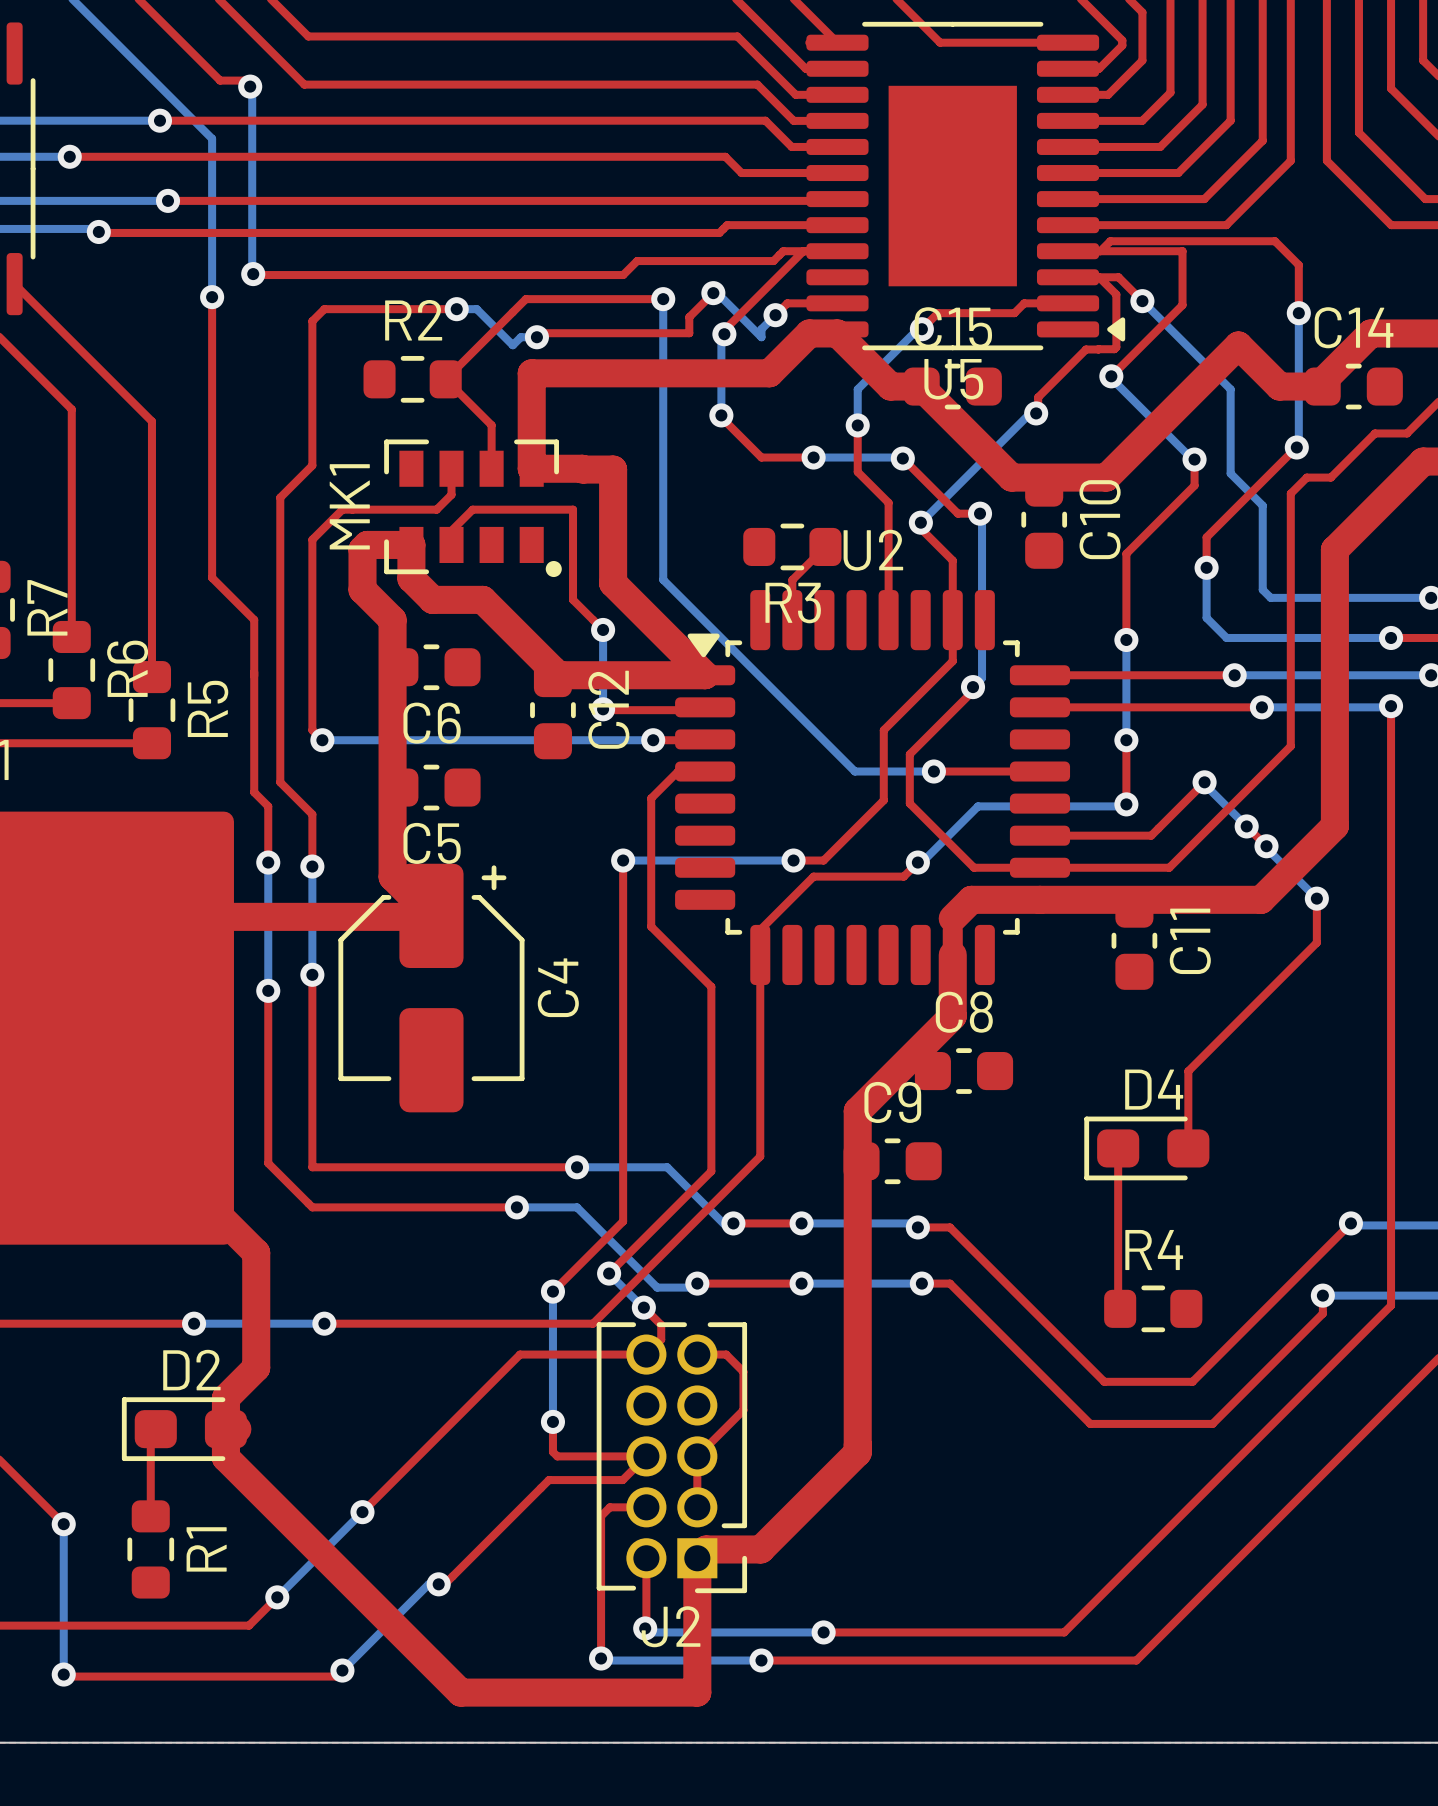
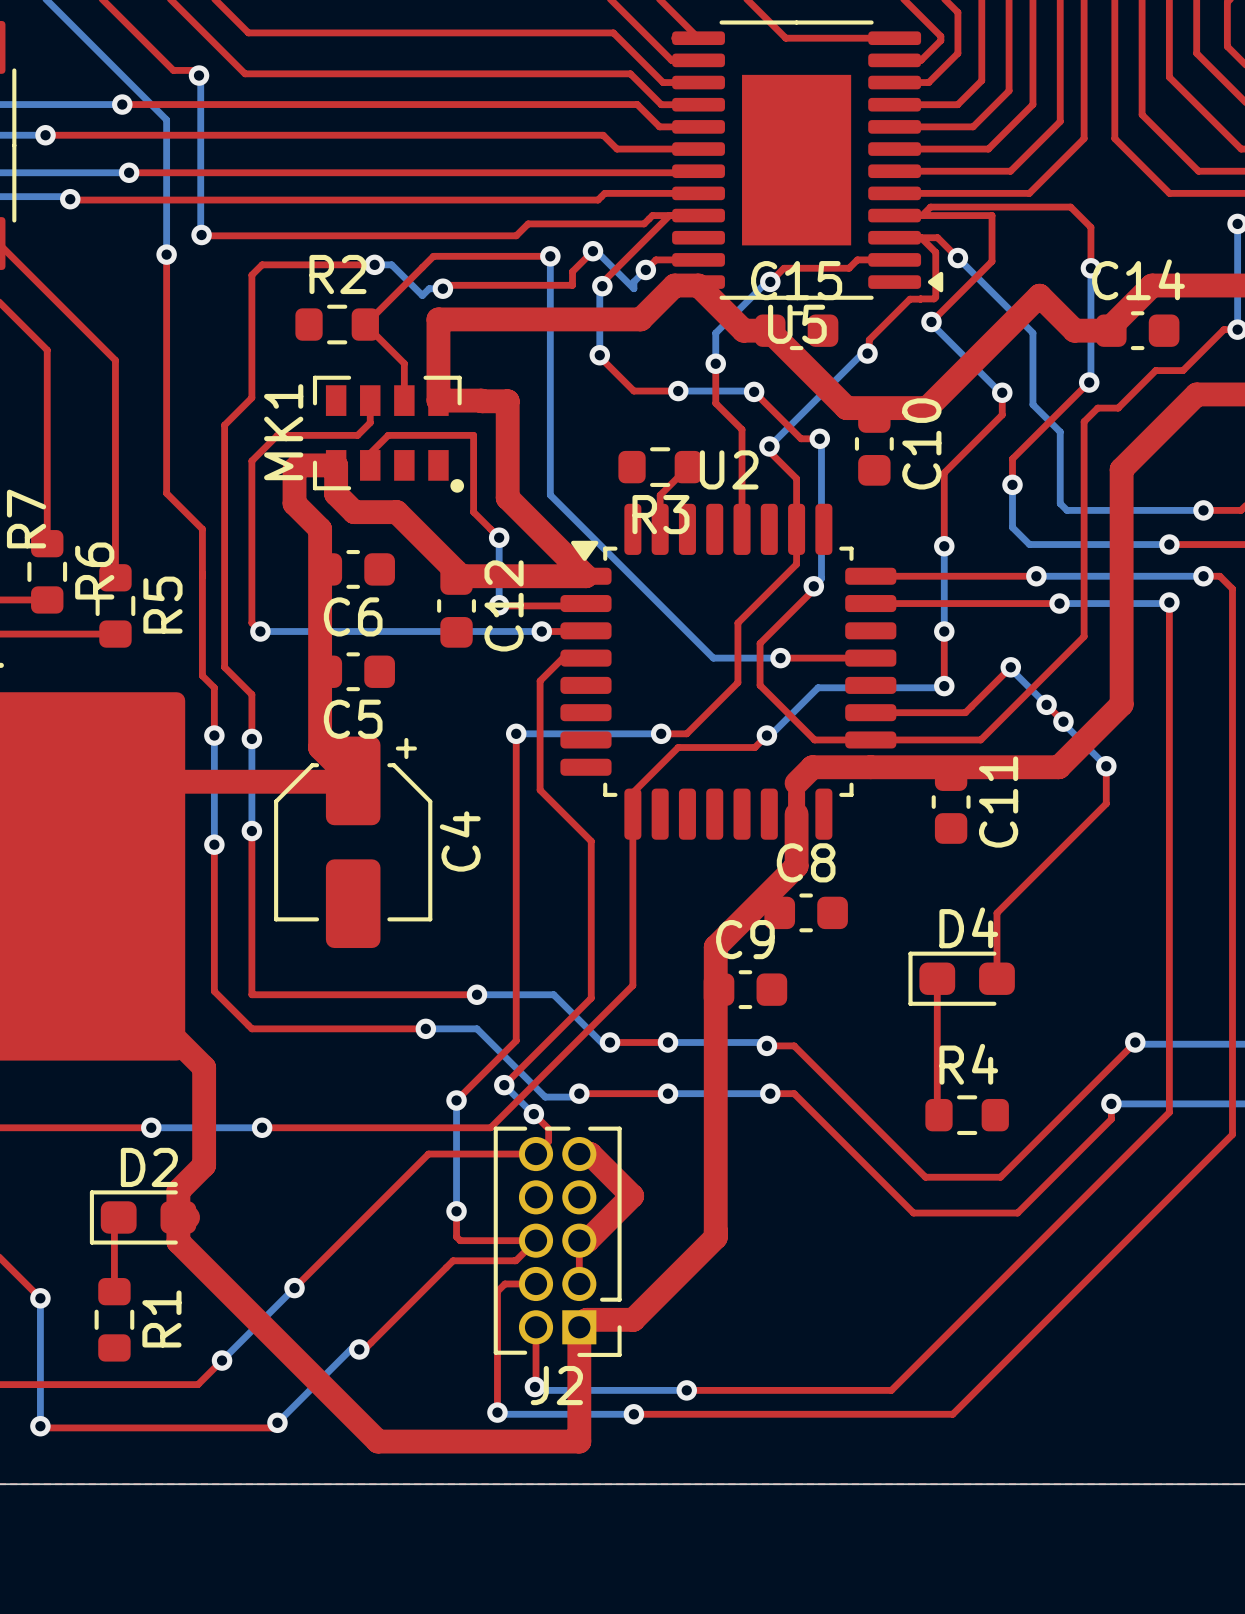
top track: (710, 1354) (726, 1354) (743, 1371) (743, 1410) (697, 1456) -> (590, 1154) (632, 1195) (587, 1240) (579, 1240)

